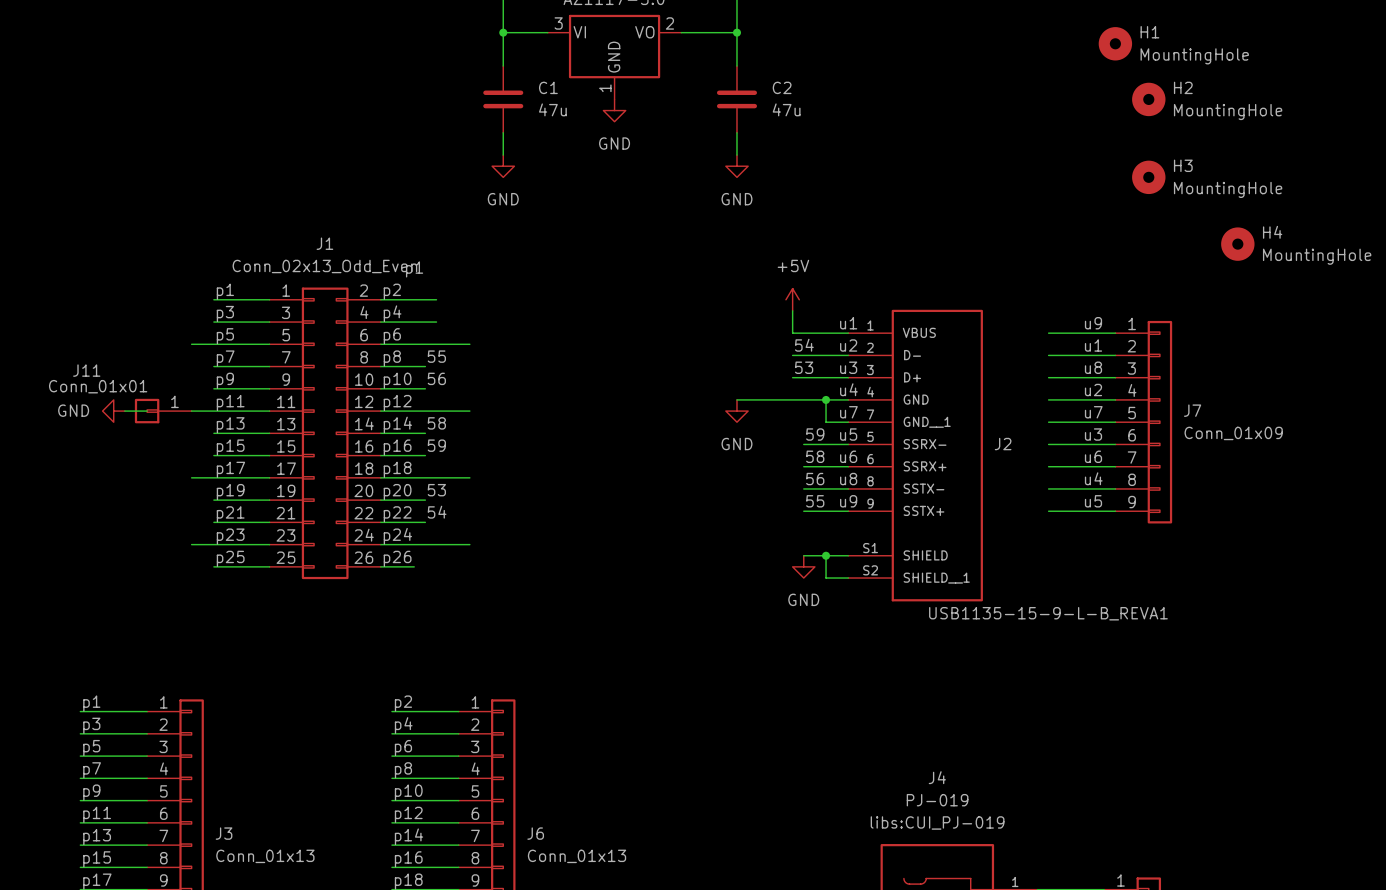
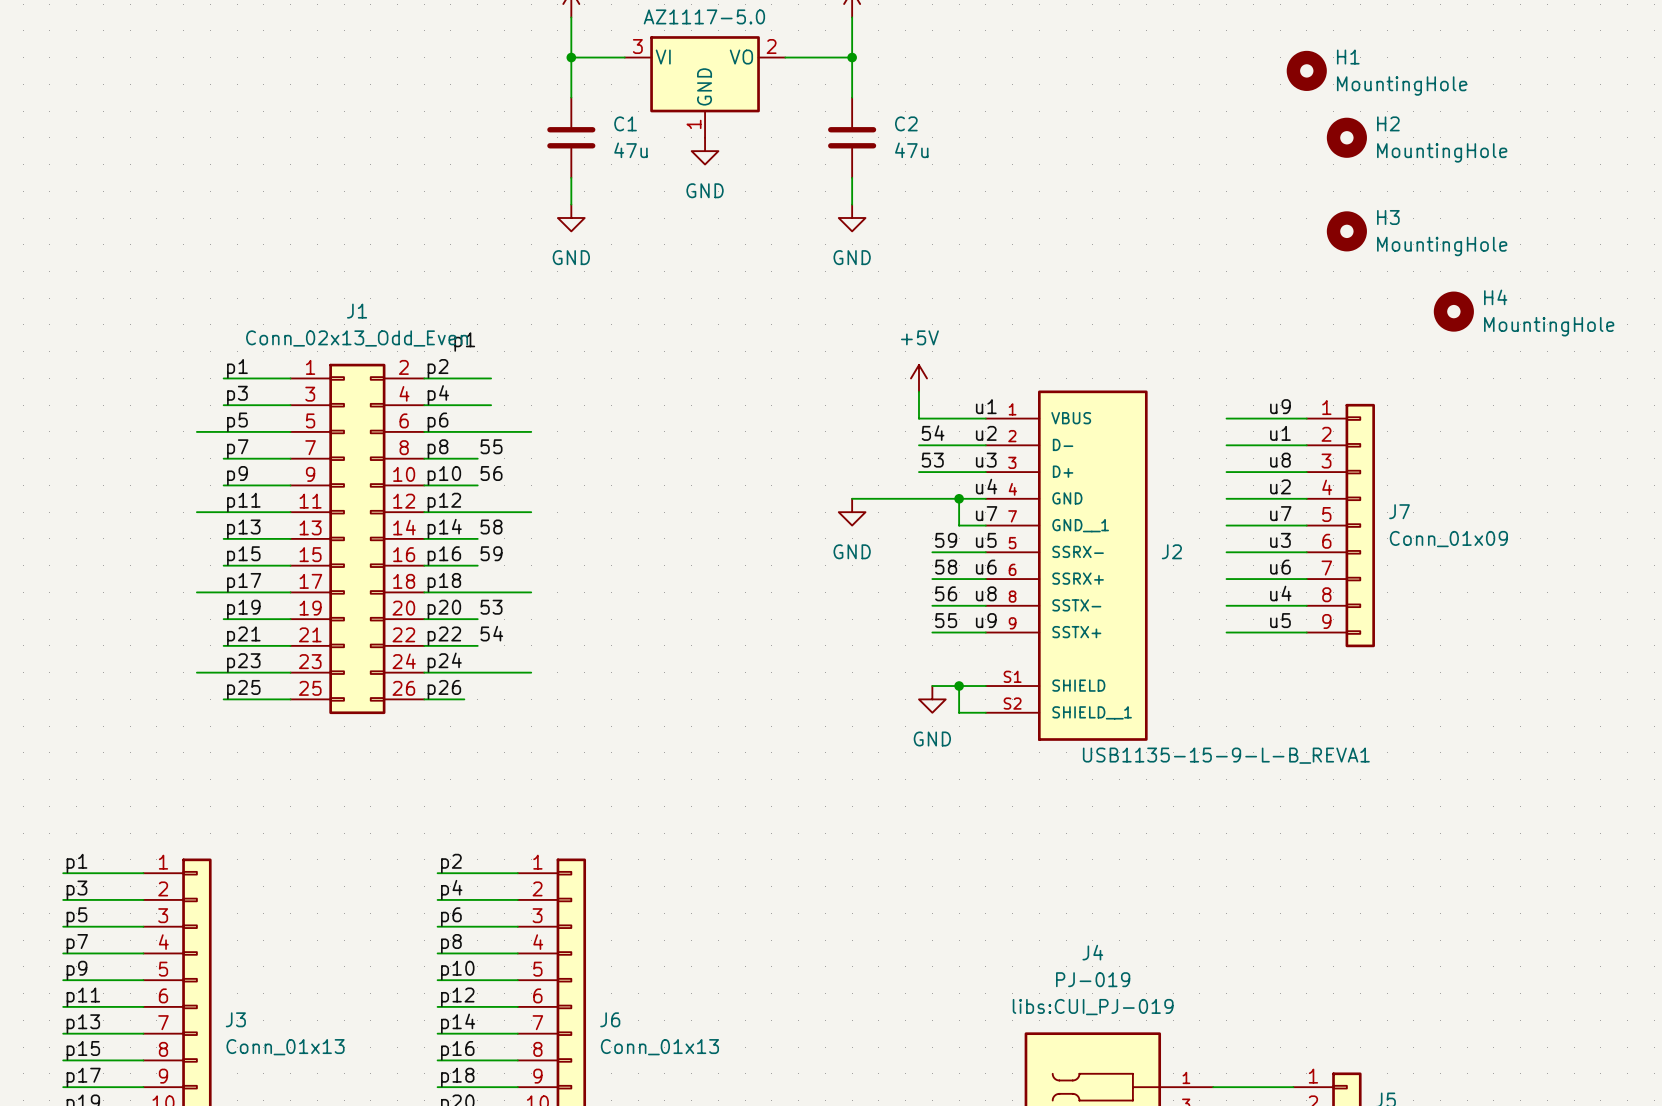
power symbol: GND (113, 411) -> none
wire: (124, 411) (147, 411) -> none
J11: Conn_01x01 (163, 411) -> none

